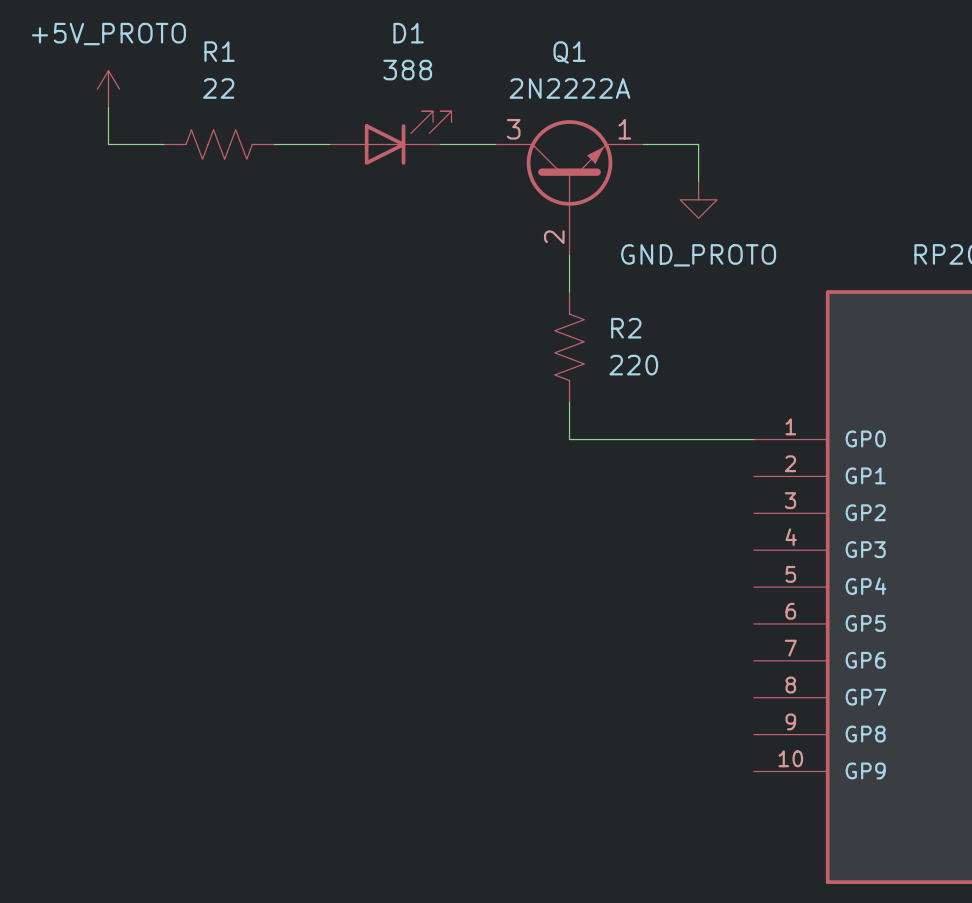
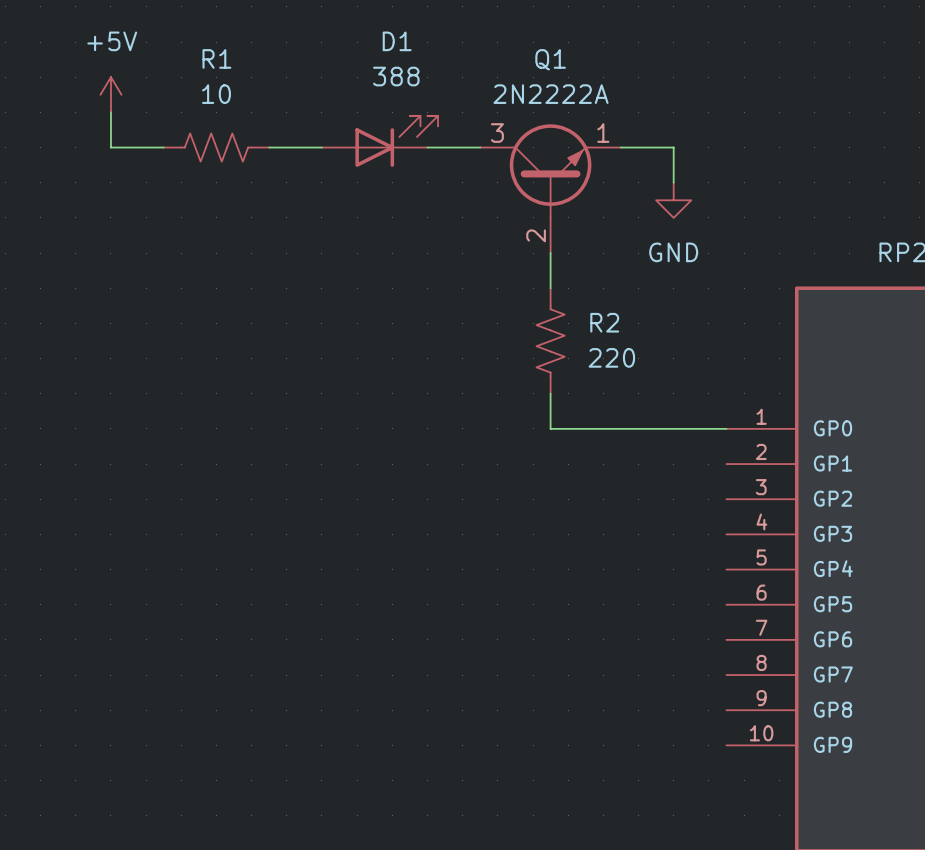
R1 value: 22 (218, 88) -> 10 (216, 94)
power symbol: +5V_PROTO (108, 89) -> +5V (110, 94)
power symbol: GND_PROTO (698, 199) -> GND (673, 200)

